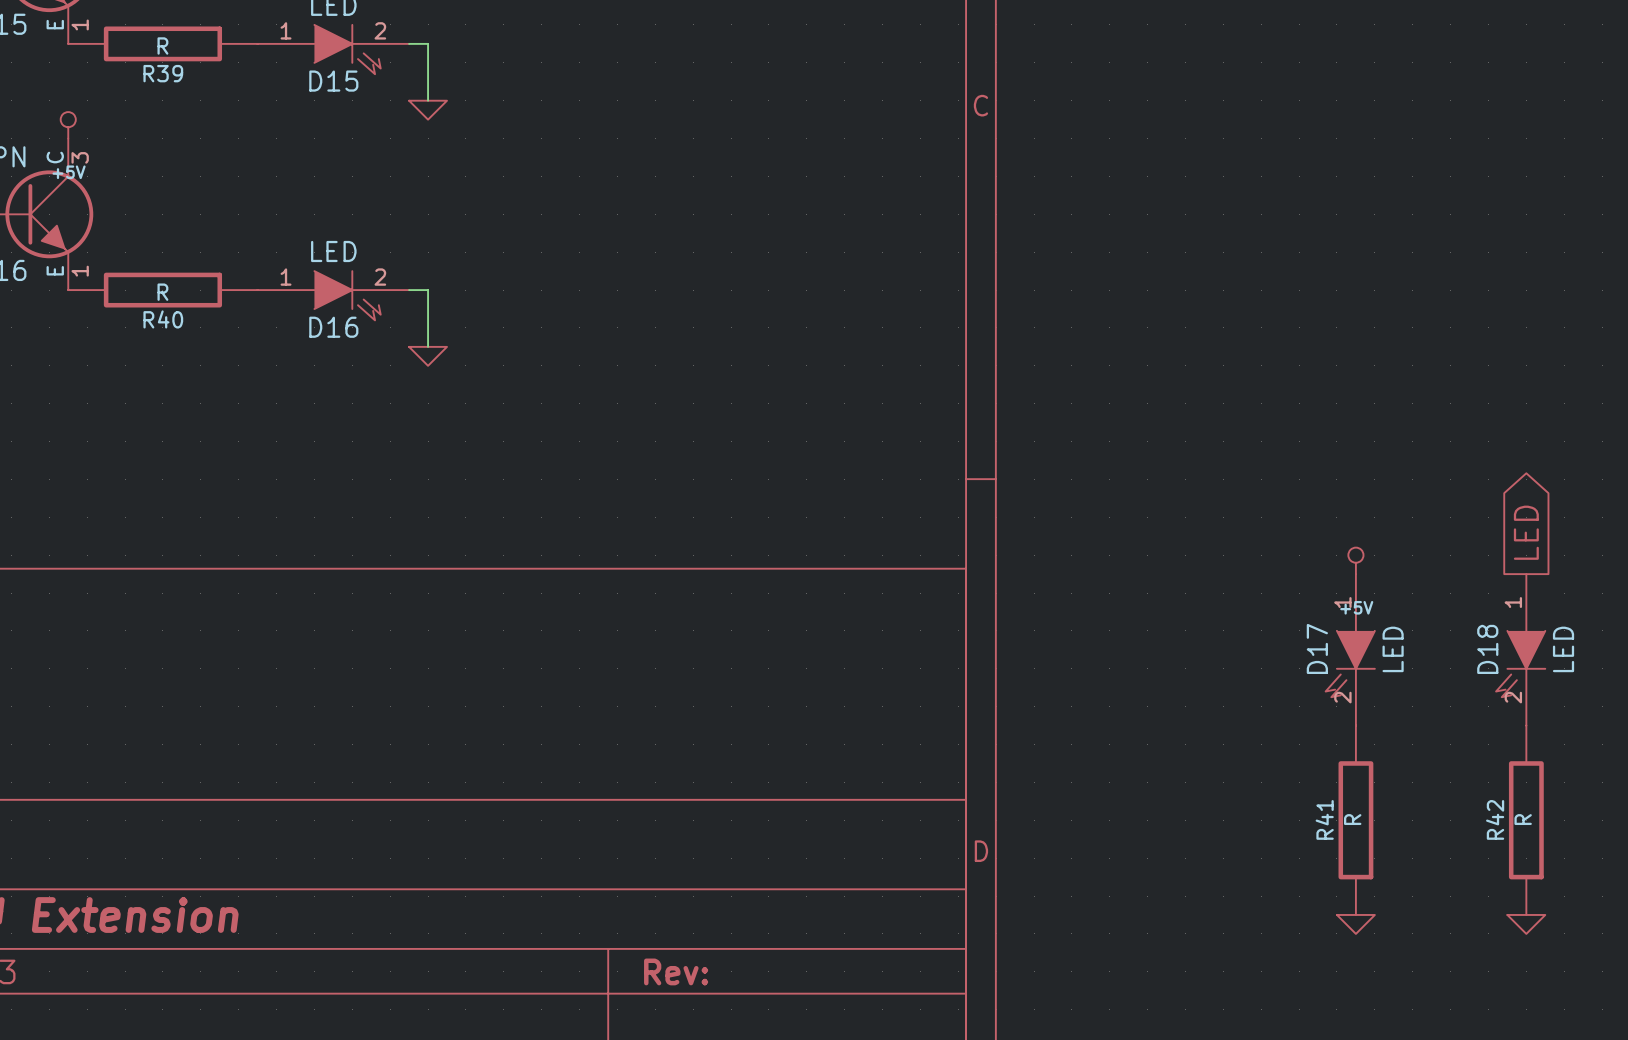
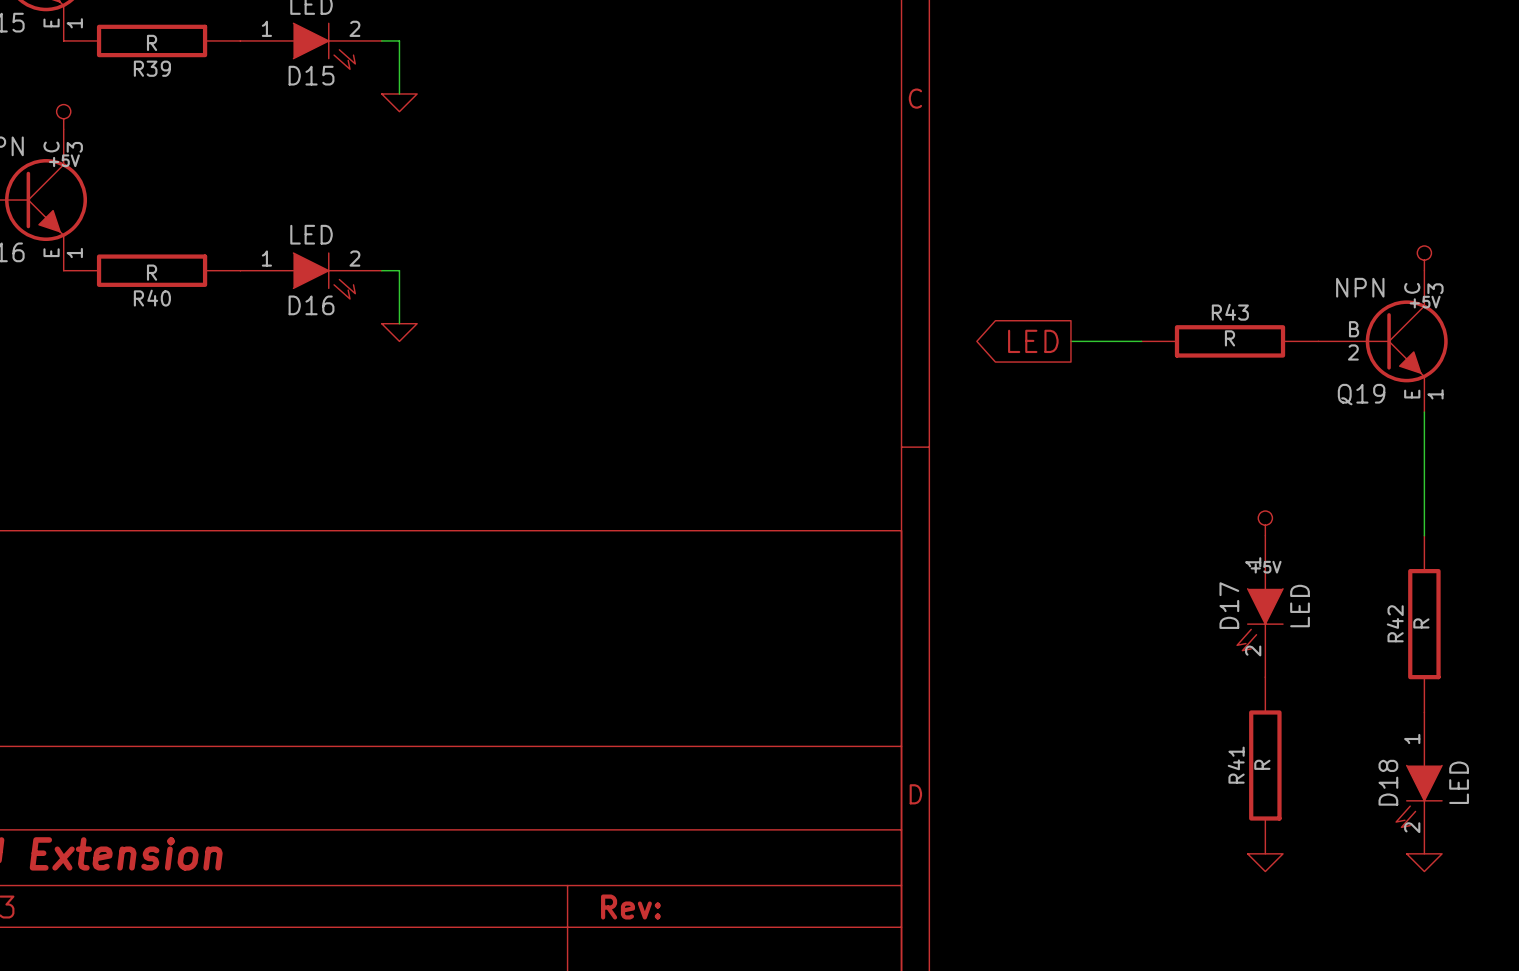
power symbol: none -> +5V (1424, 258)
global label: none -> LED (1033, 341)
wire: none -> (1070, 341) (1141, 341)
R43: none -> R (1230, 341)
Q19: none -> NPN (1383, 341)
wire: none -> (1424, 412) (1424, 535)
global label: LED (1526, 532) -> none
D18 position: (1520, 649) -> (1419, 783)
R42 position: (1526, 820) -> (1424, 624)

